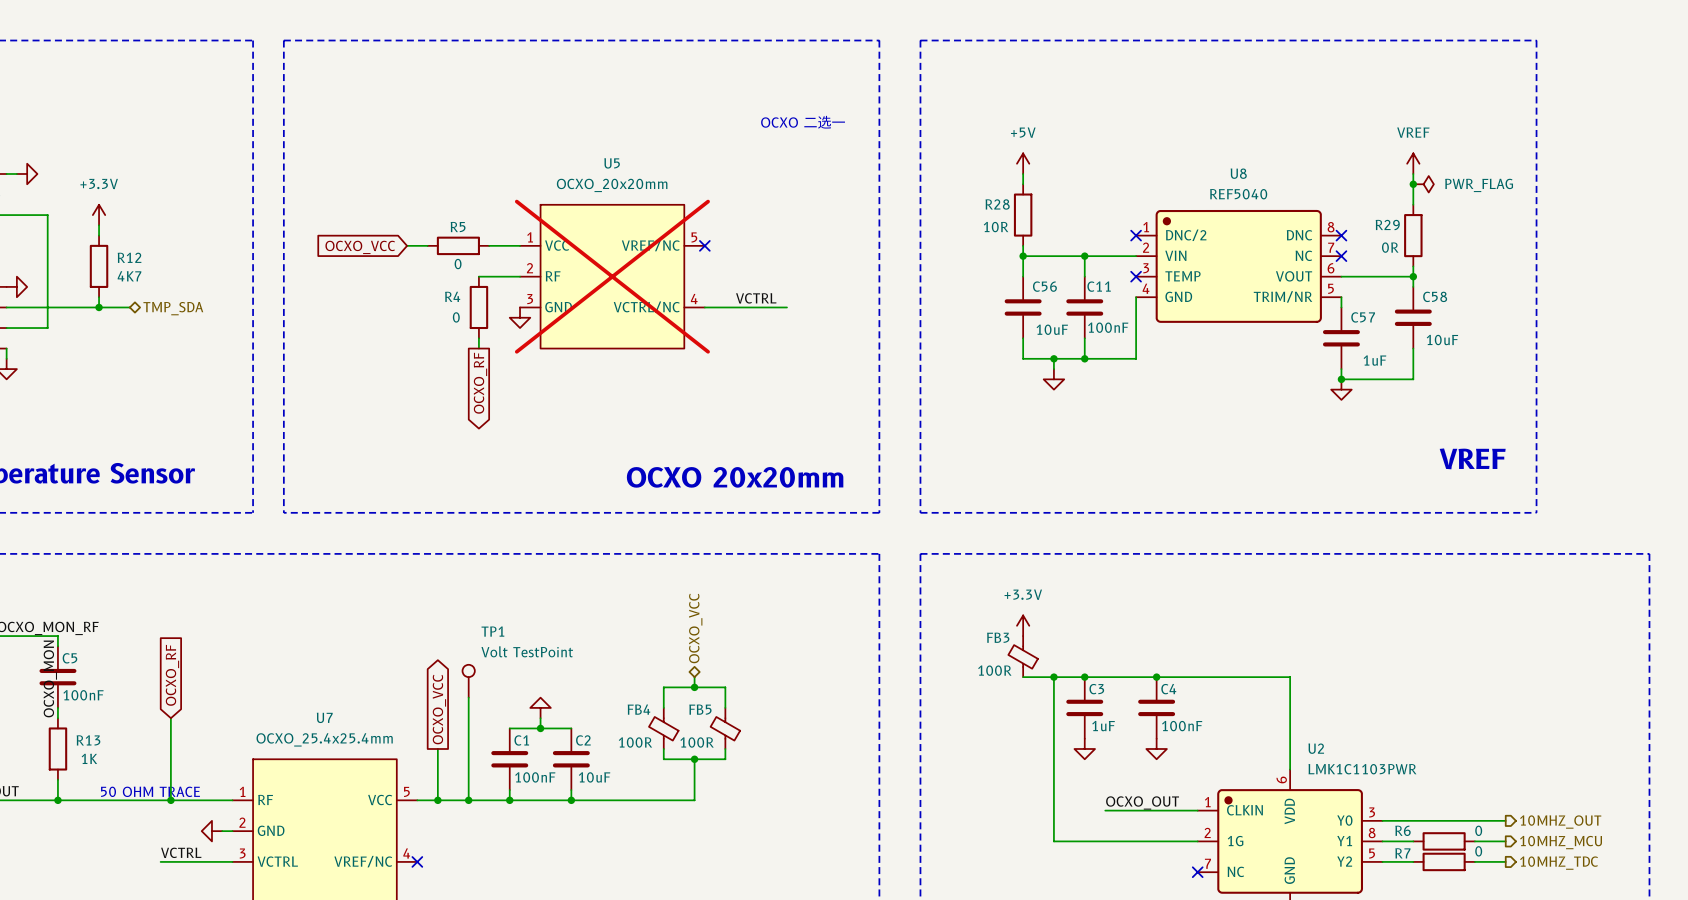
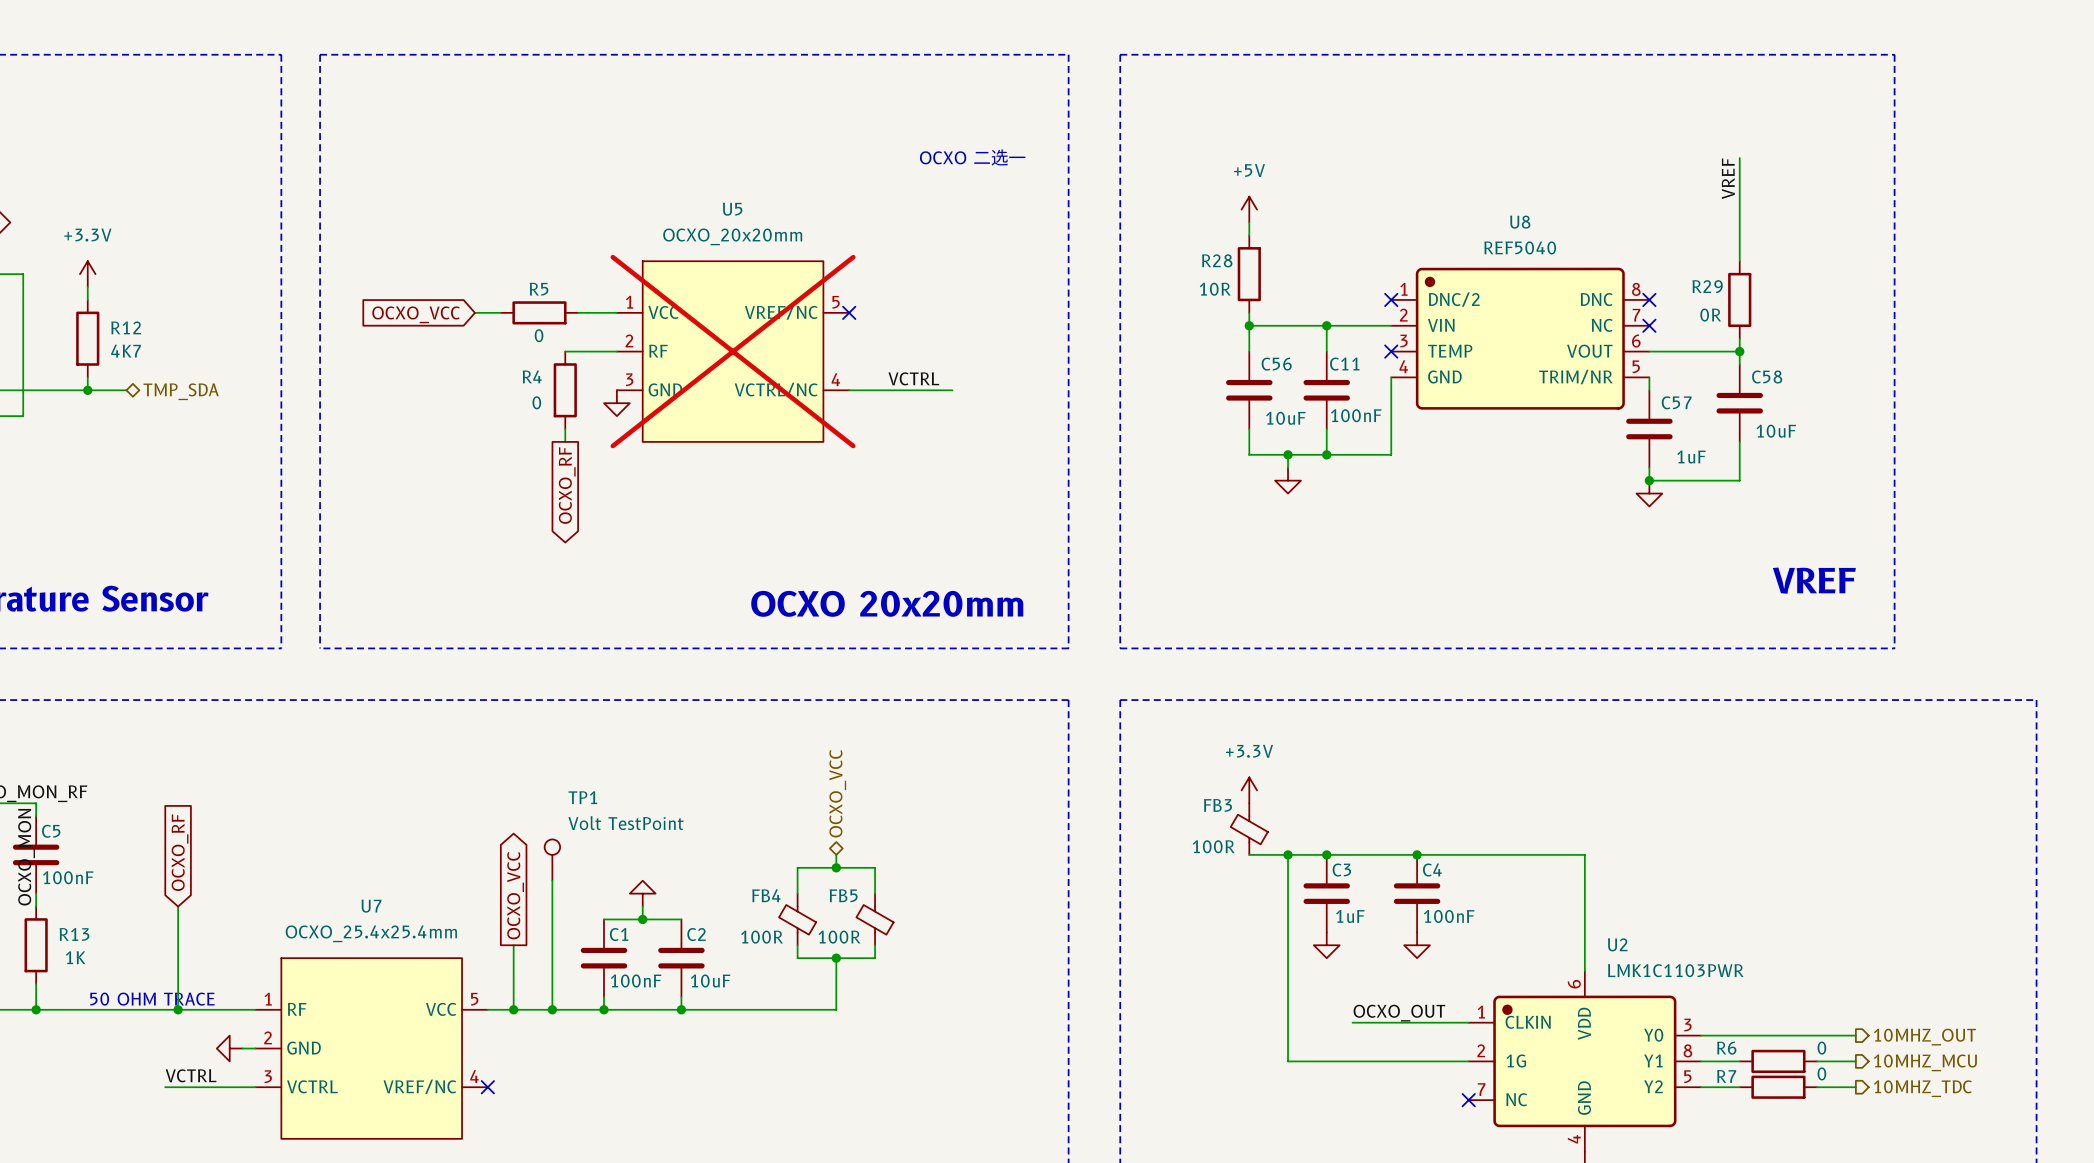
wire: none -> (1739, 157) (1739, 222)
label: none -> VREF (1728, 178)
power symbol: VREF (1413, 163) -> none
junction: (1413, 184) -> none
power symbol: PWR_FLAG (1423, 184) -> none

